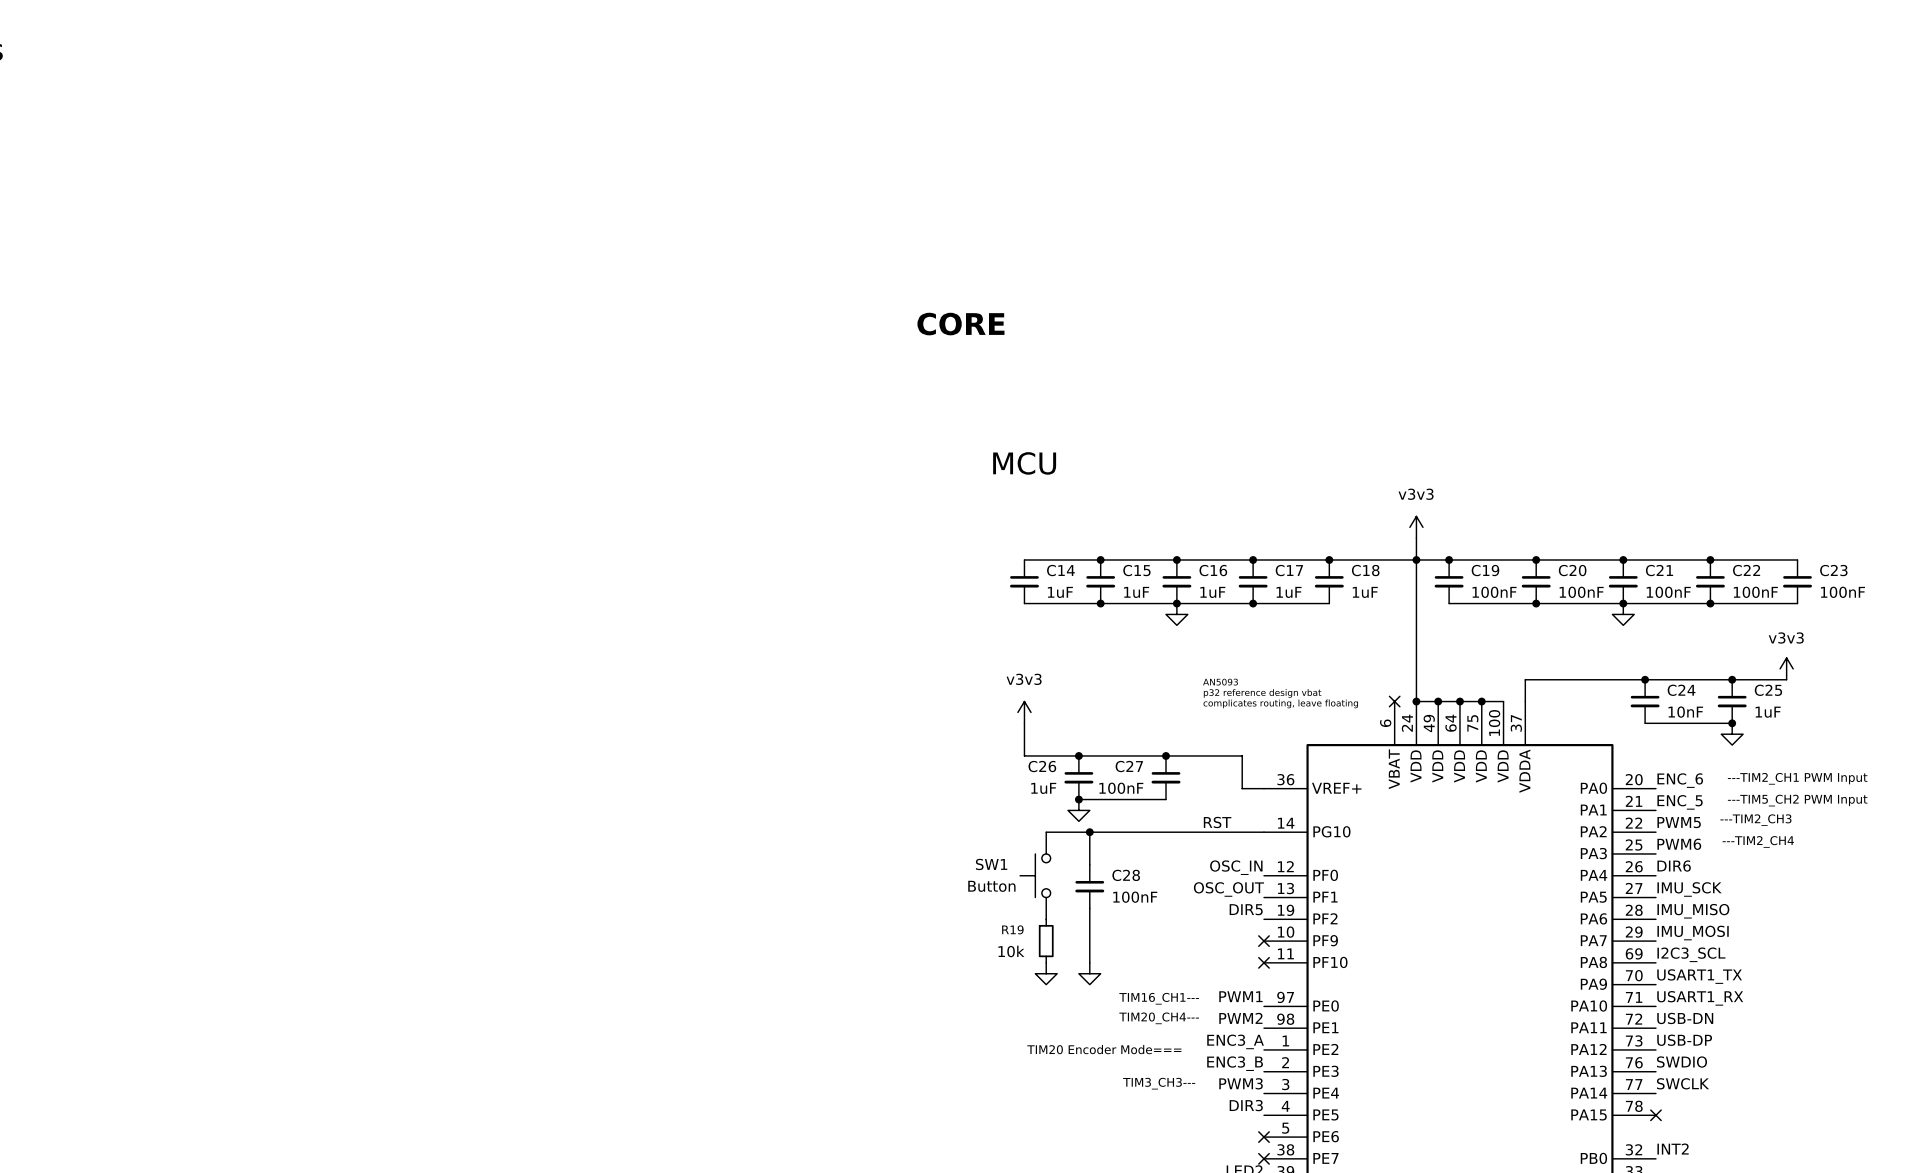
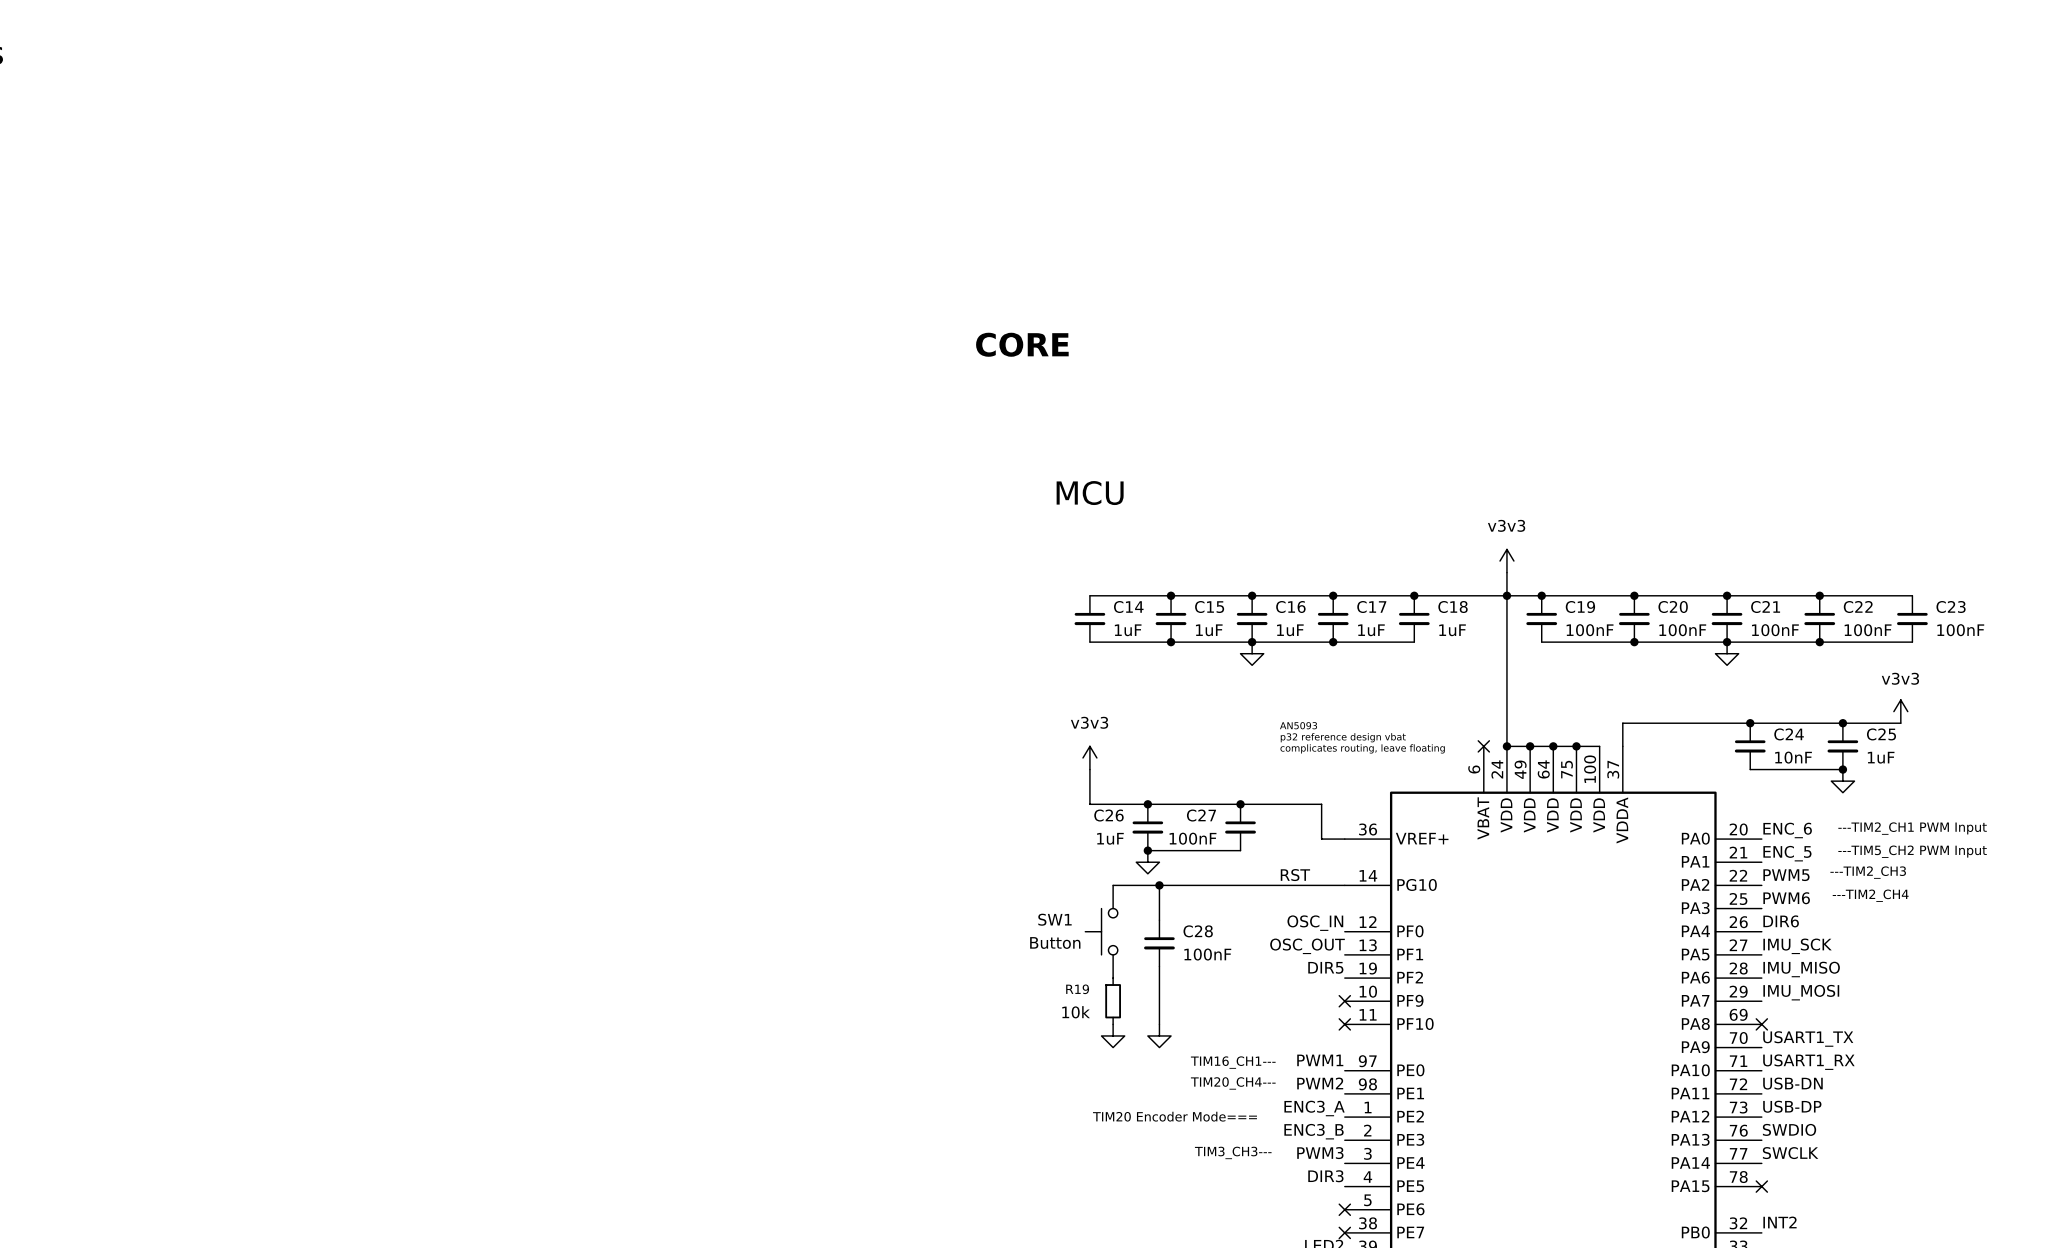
label: I2C3_SCL (1691, 954) -> none
no-connect mark: none -> (1761, 1024)

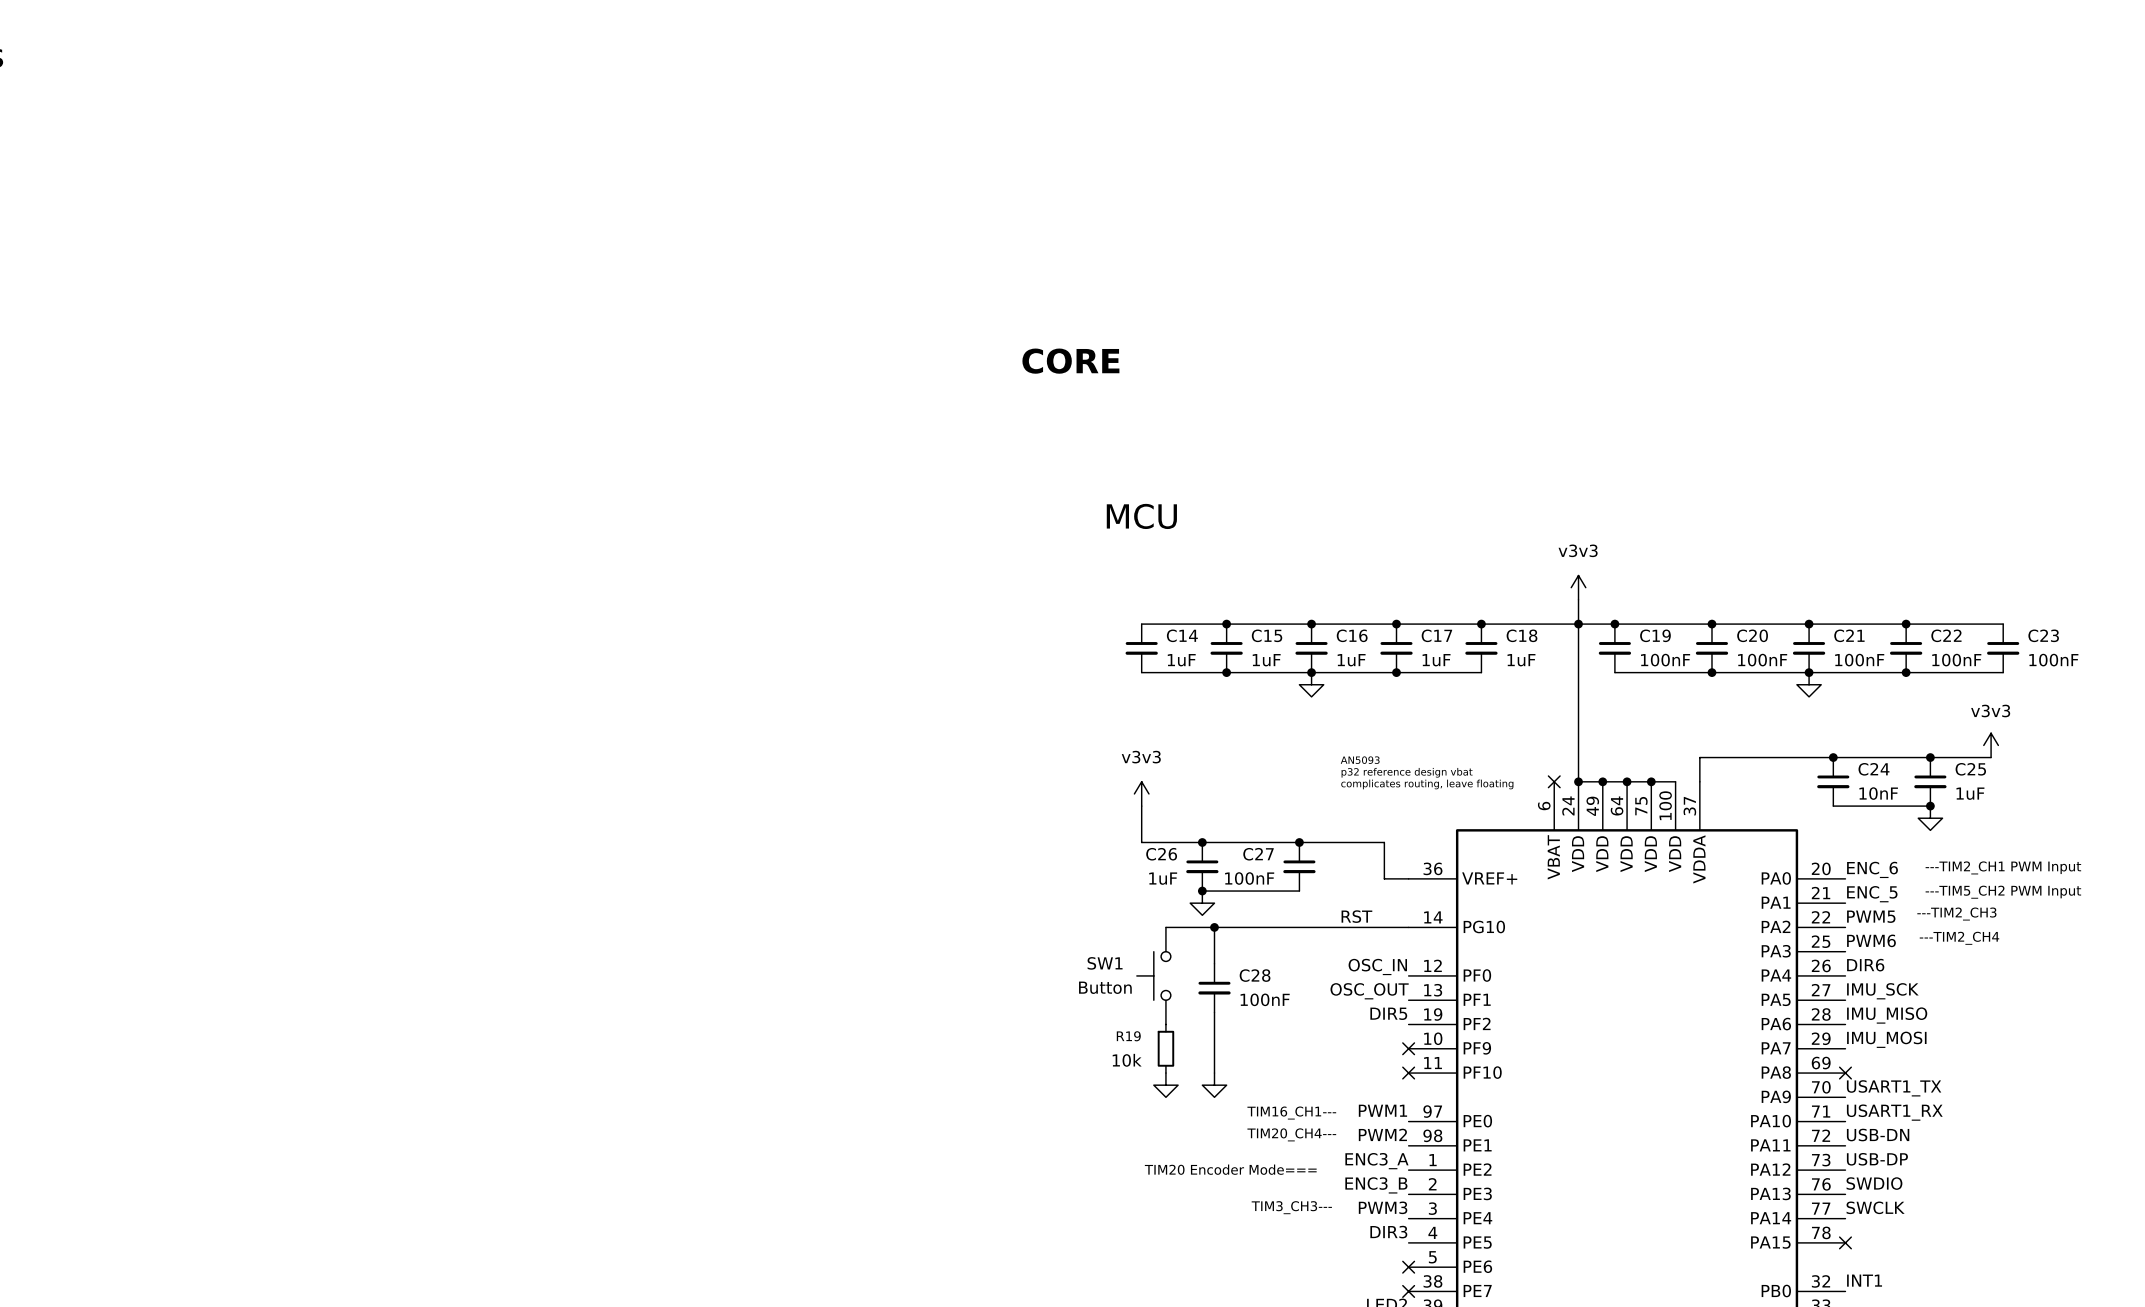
label: INT2 (1779, 1222) -> INT1 (1864, 1280)

